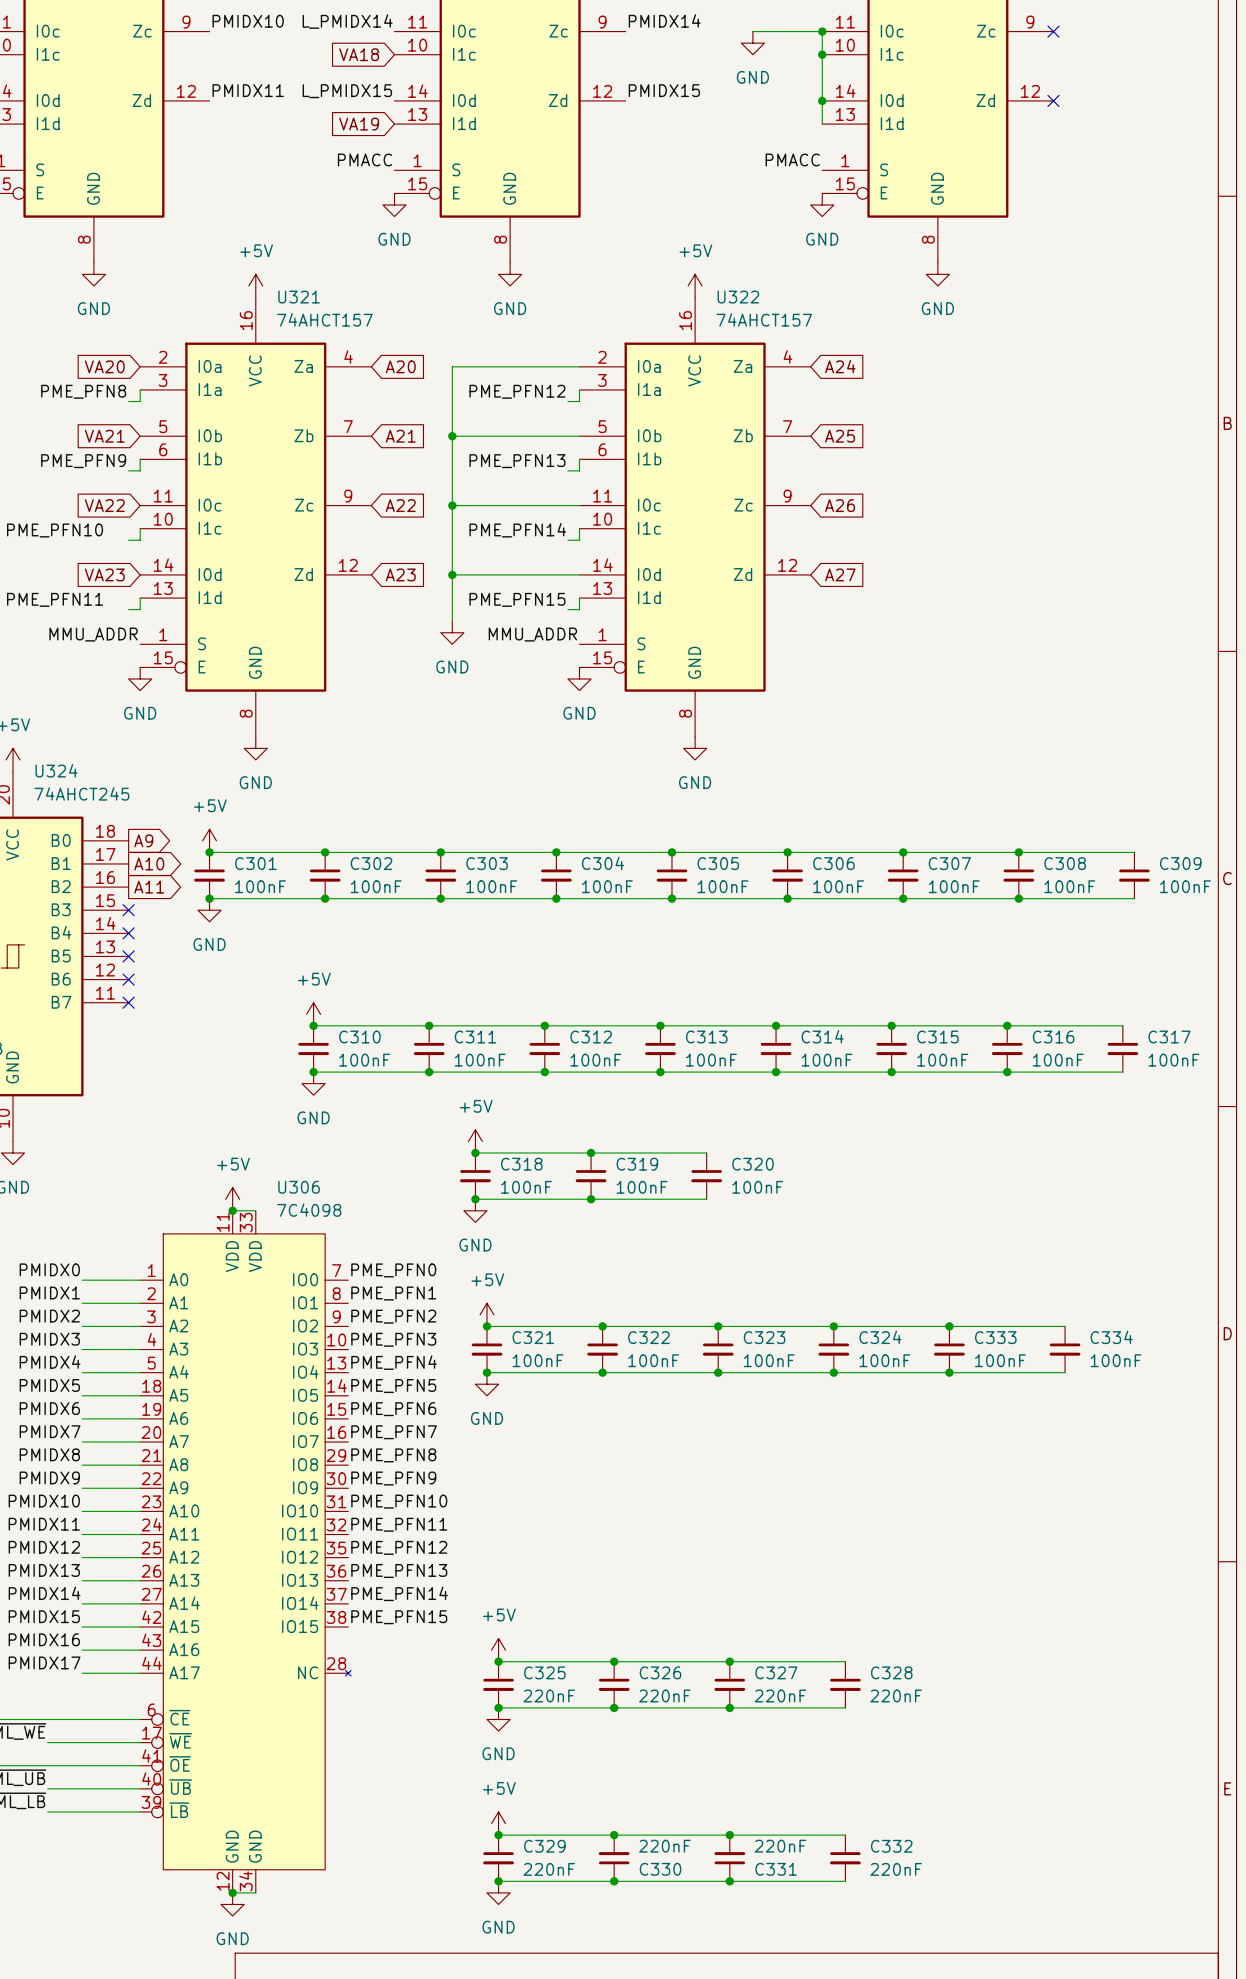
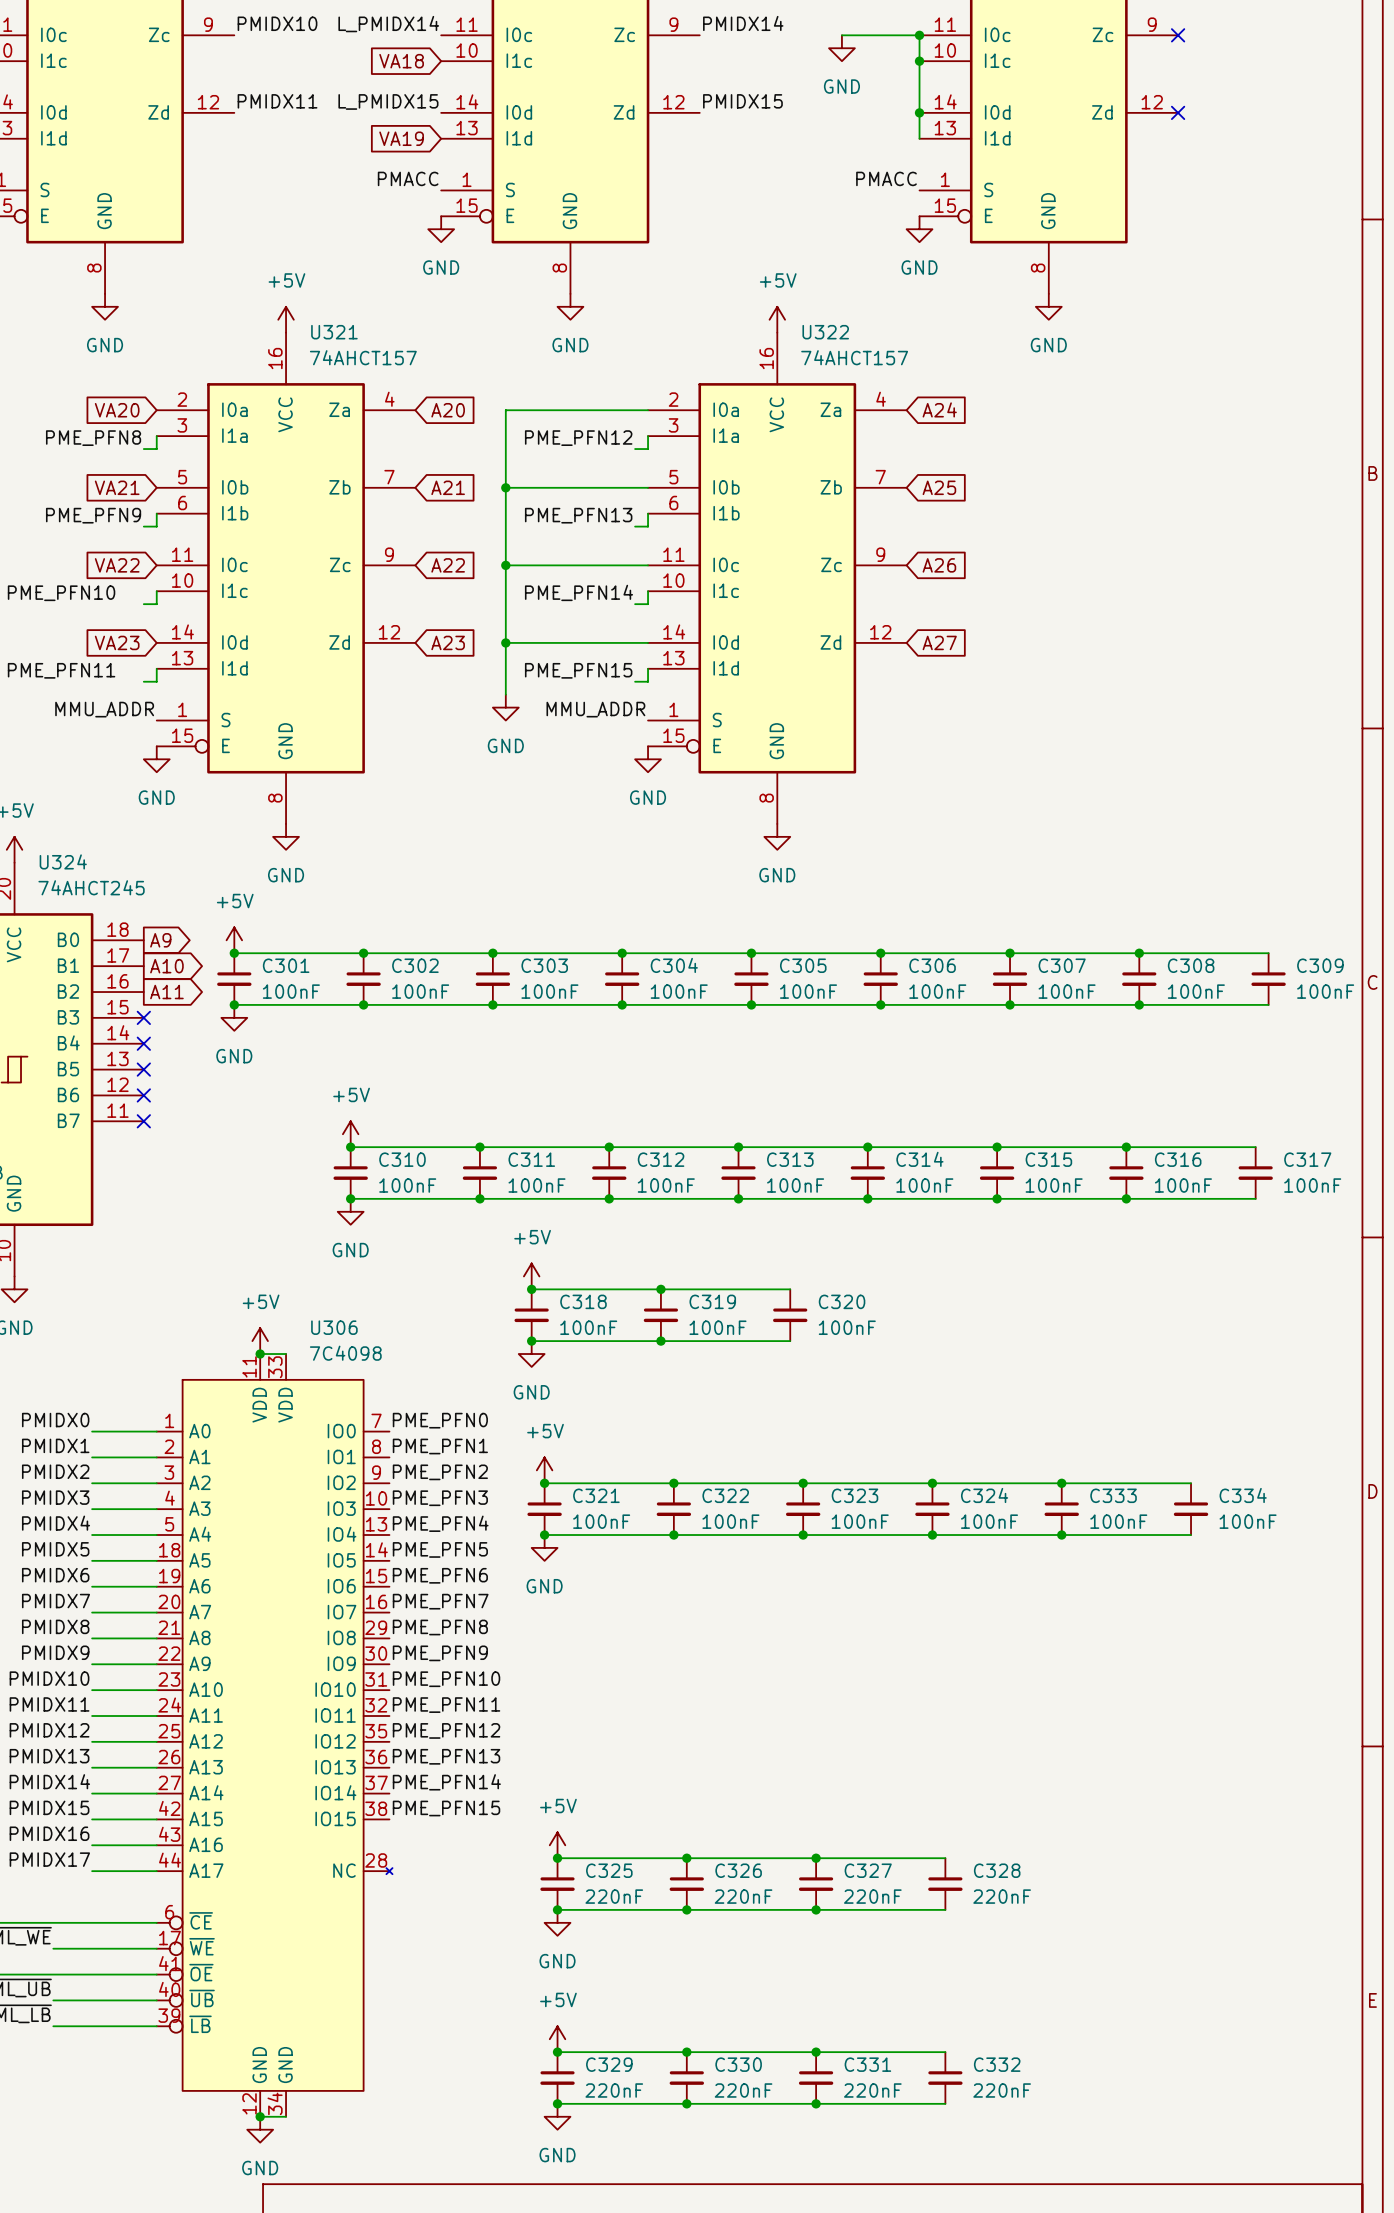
C330 value position: 220nF (664, 1846) -> 220nF (743, 2090)
C331 value position: 220nF (780, 1846) -> 220nF (872, 2090)
C330 rotation: 0° (614, 1858) -> 180° (686, 2078)
C331 rotation: 0° (729, 1858) -> 180° (816, 2078)
C330 name position: C330 (660, 1869) -> C330 (738, 2064)
C331 name position: C331 (776, 1869) -> C331 (867, 2064)

